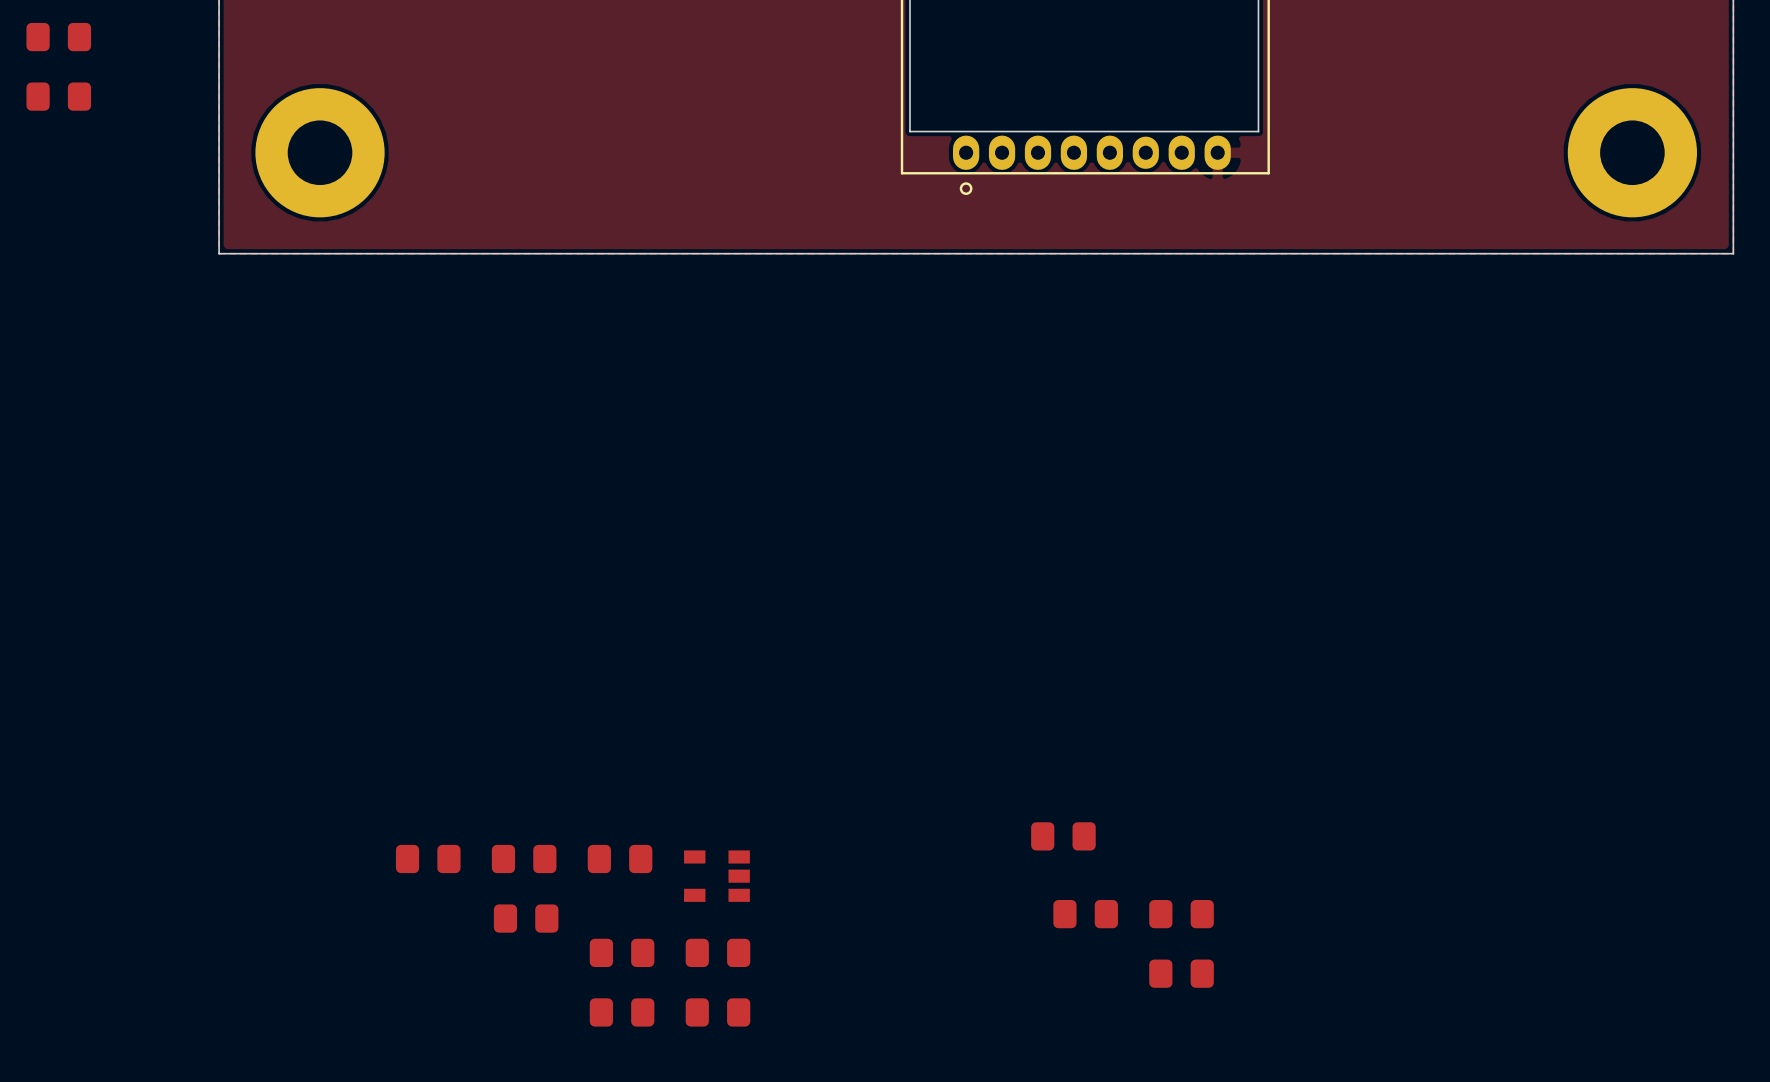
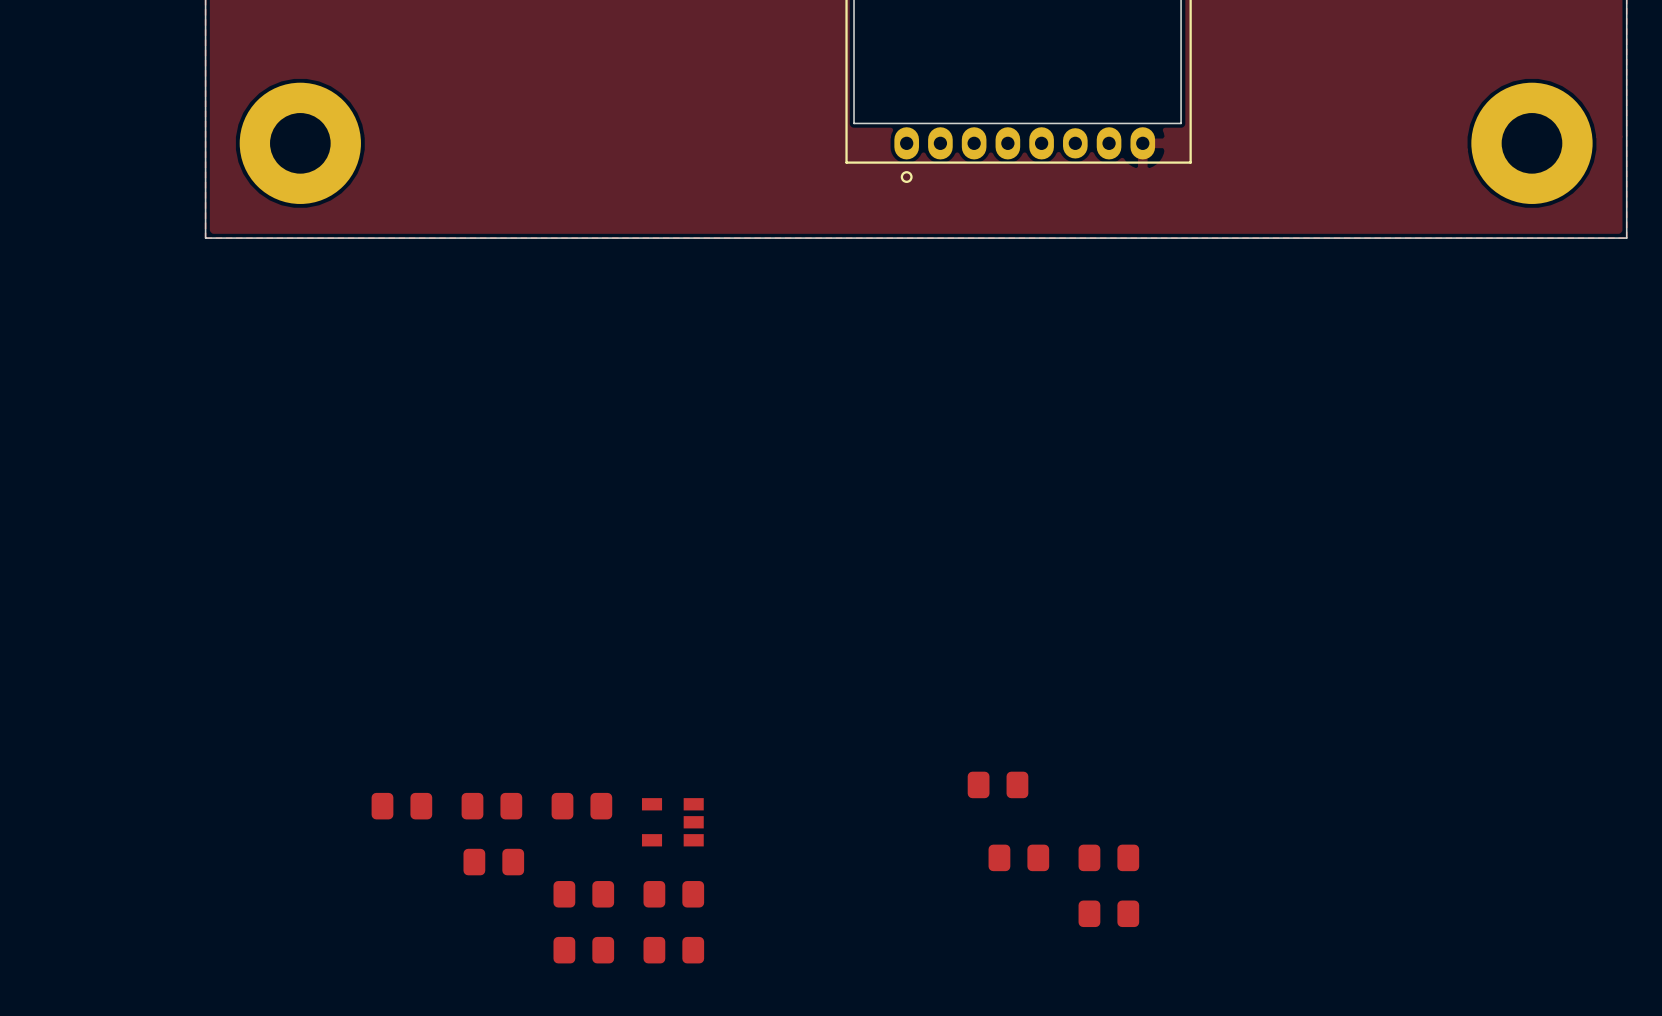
part: (58, 37) -> none
part: (58, 96) -> none

